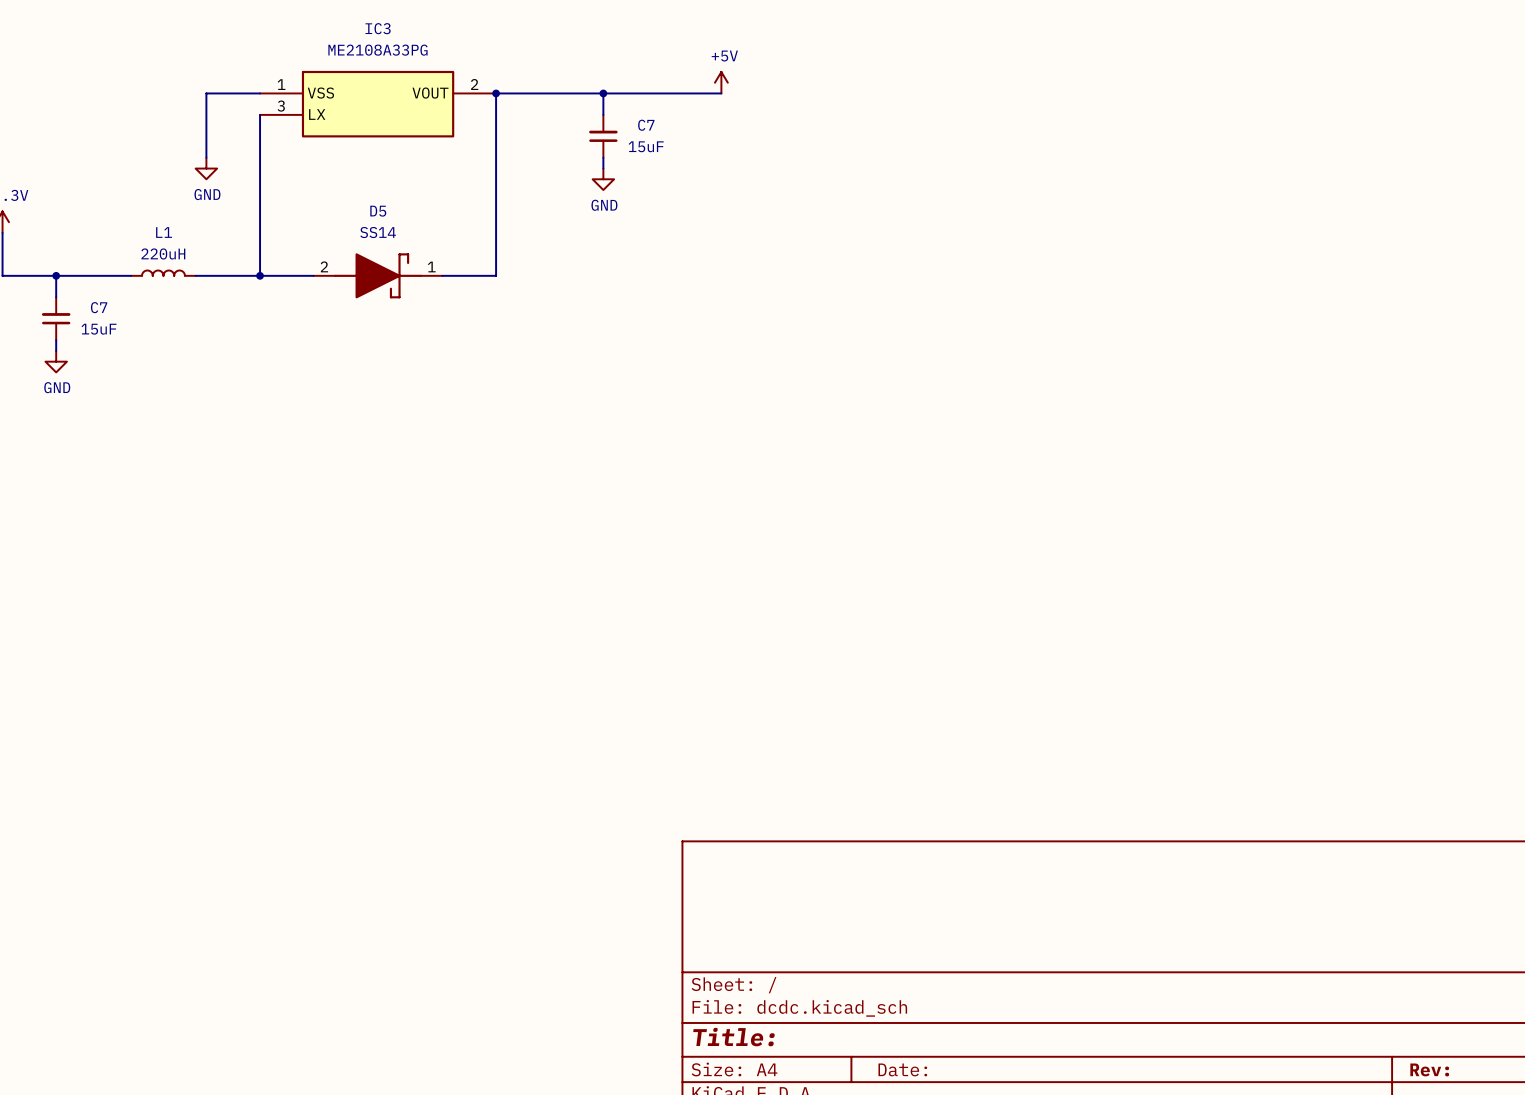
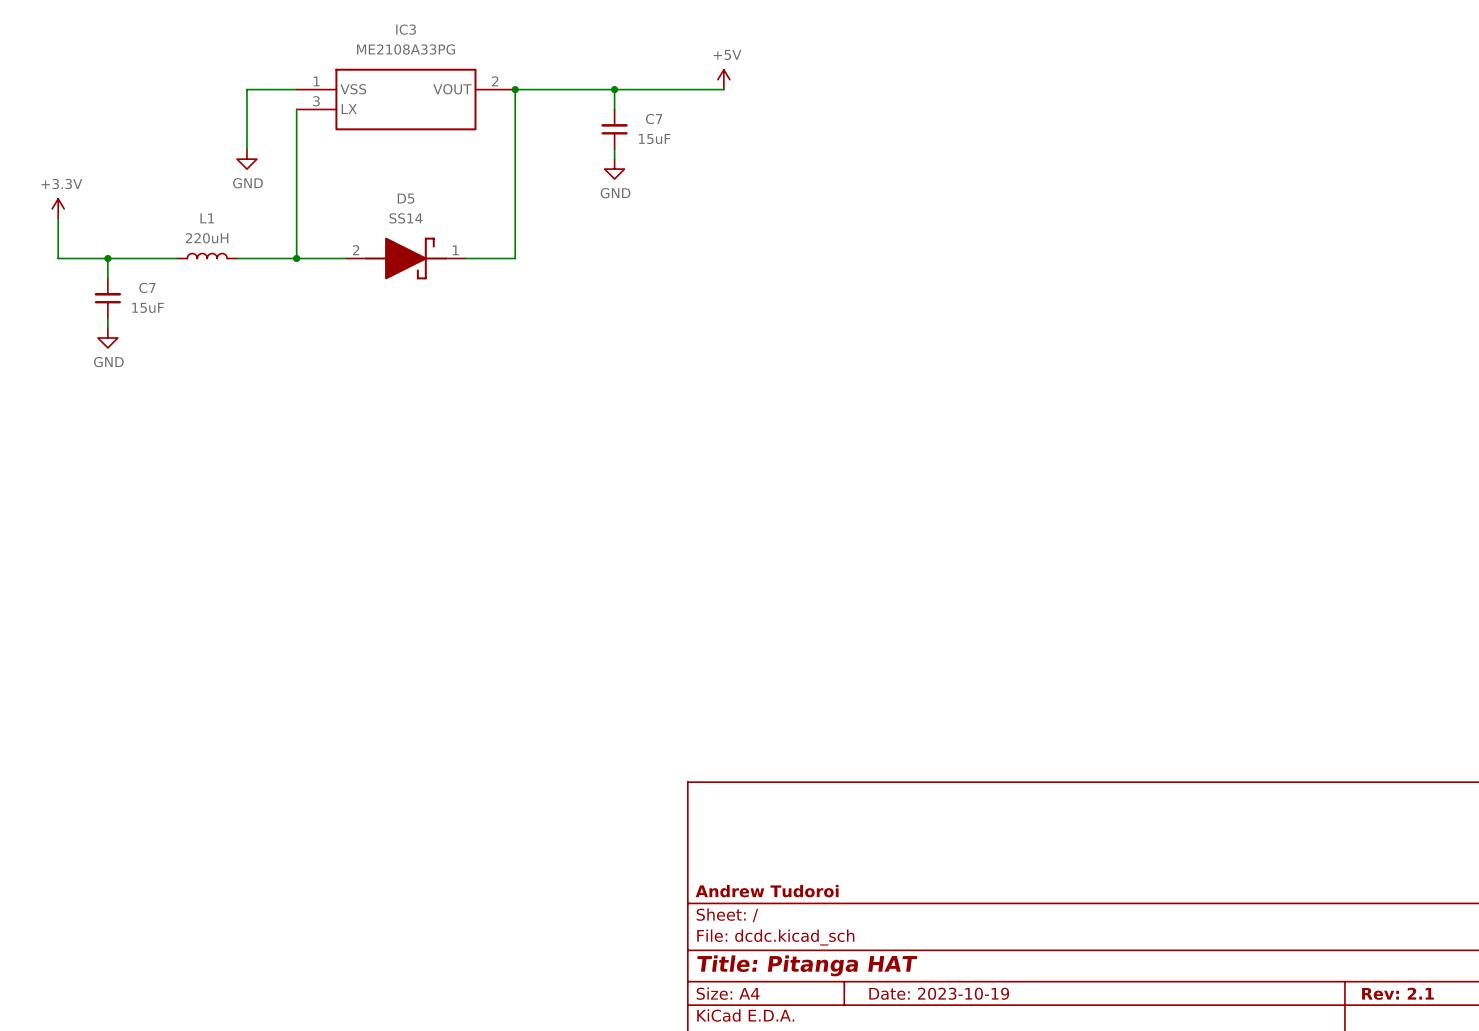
title block: none -> Andrew Tudoroi (767, 891)
title block: Title: (733, 1037) -> Title: Pitanga HAT (807, 965)
title block: Date: (902, 1069) -> Date: 2023-10-19 (939, 993)
title block: Rev: (1429, 1069) -> Rev: 2.1 (1397, 993)

